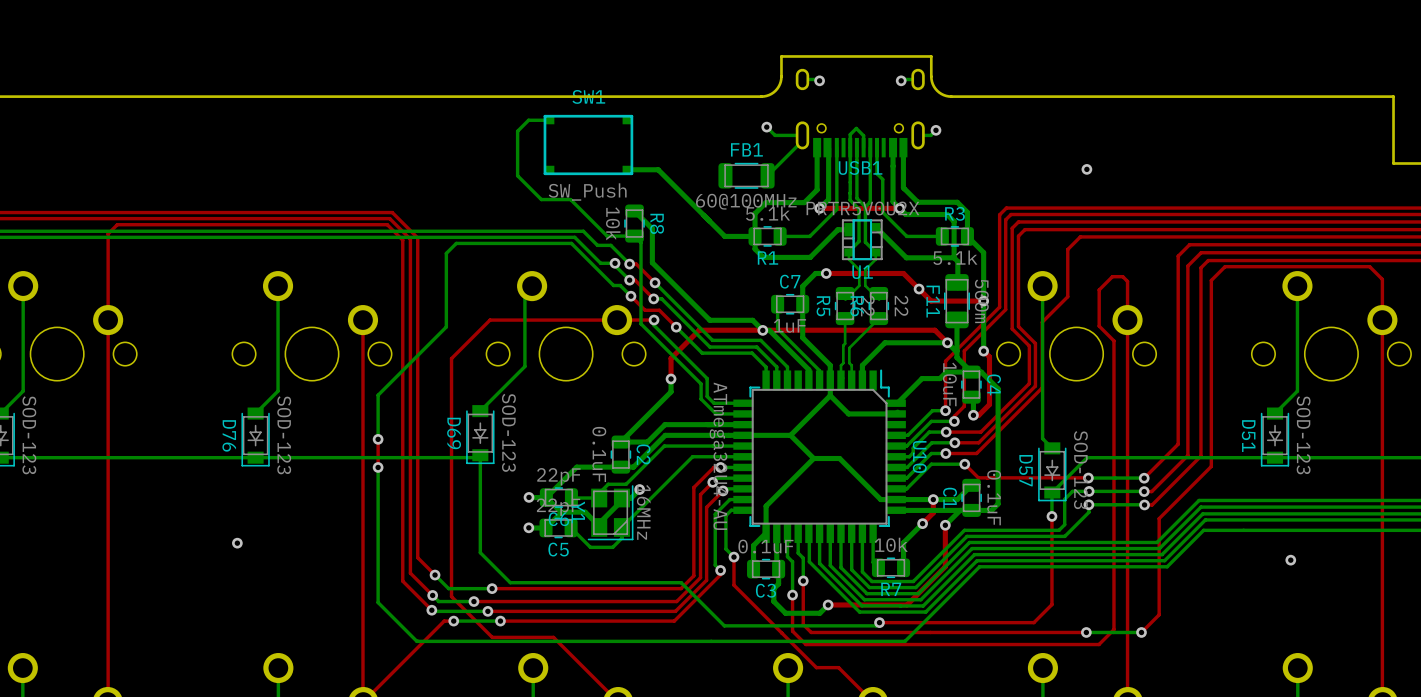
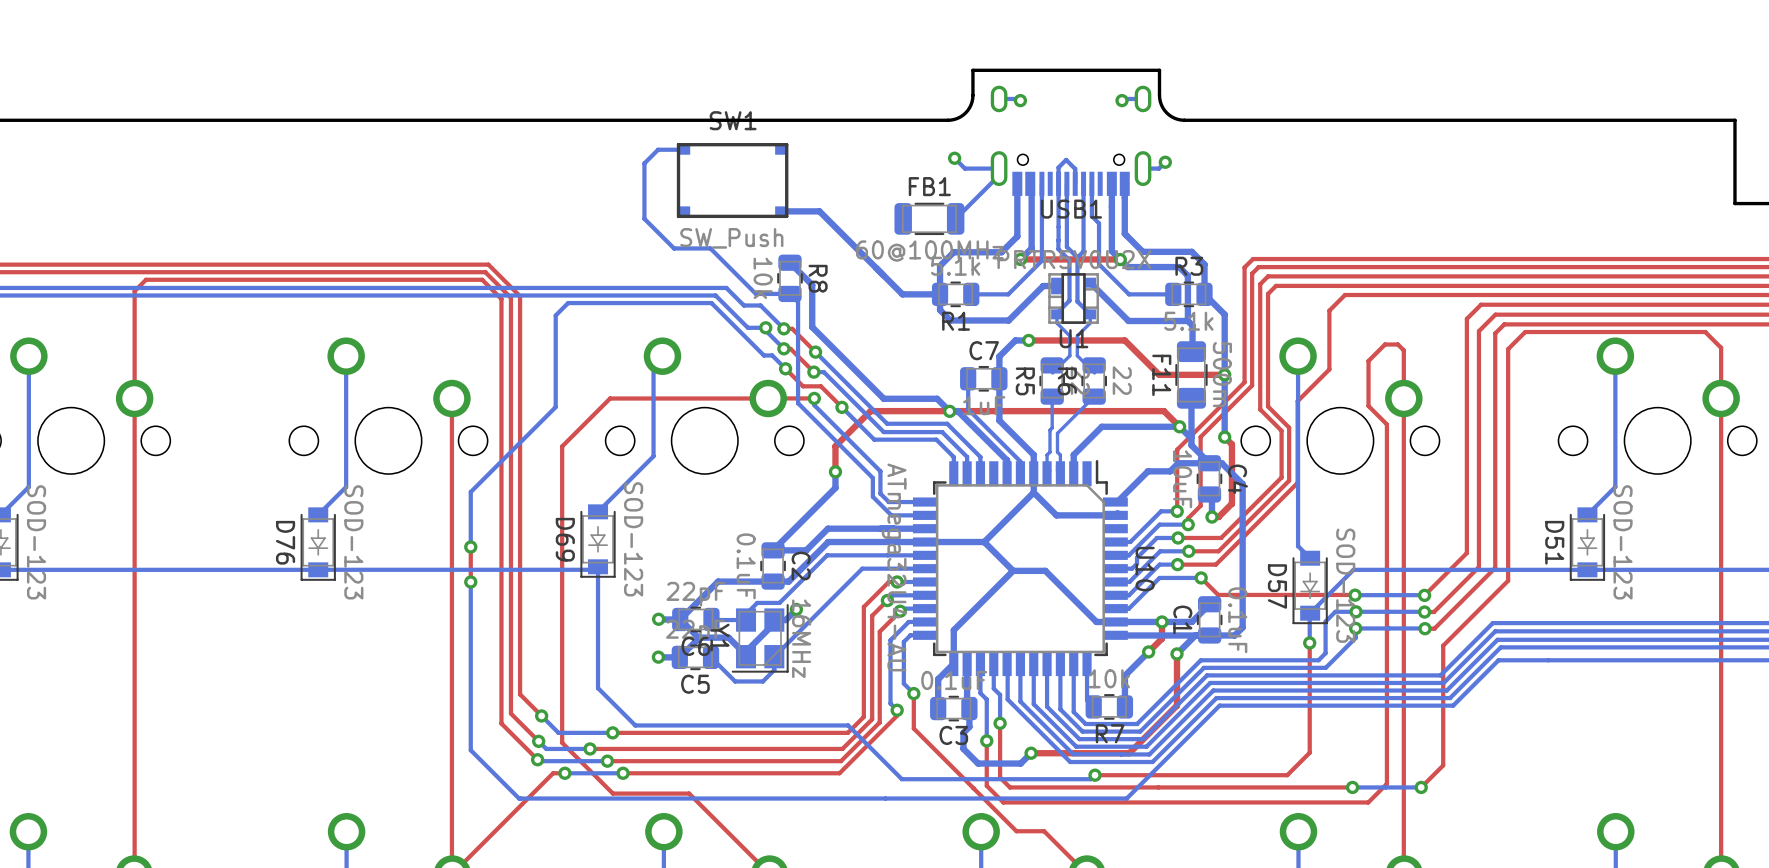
via: (1086, 169) -> none
via: (919, 289) -> none
via: (237, 543) -> none
via: (1290, 560) -> none

